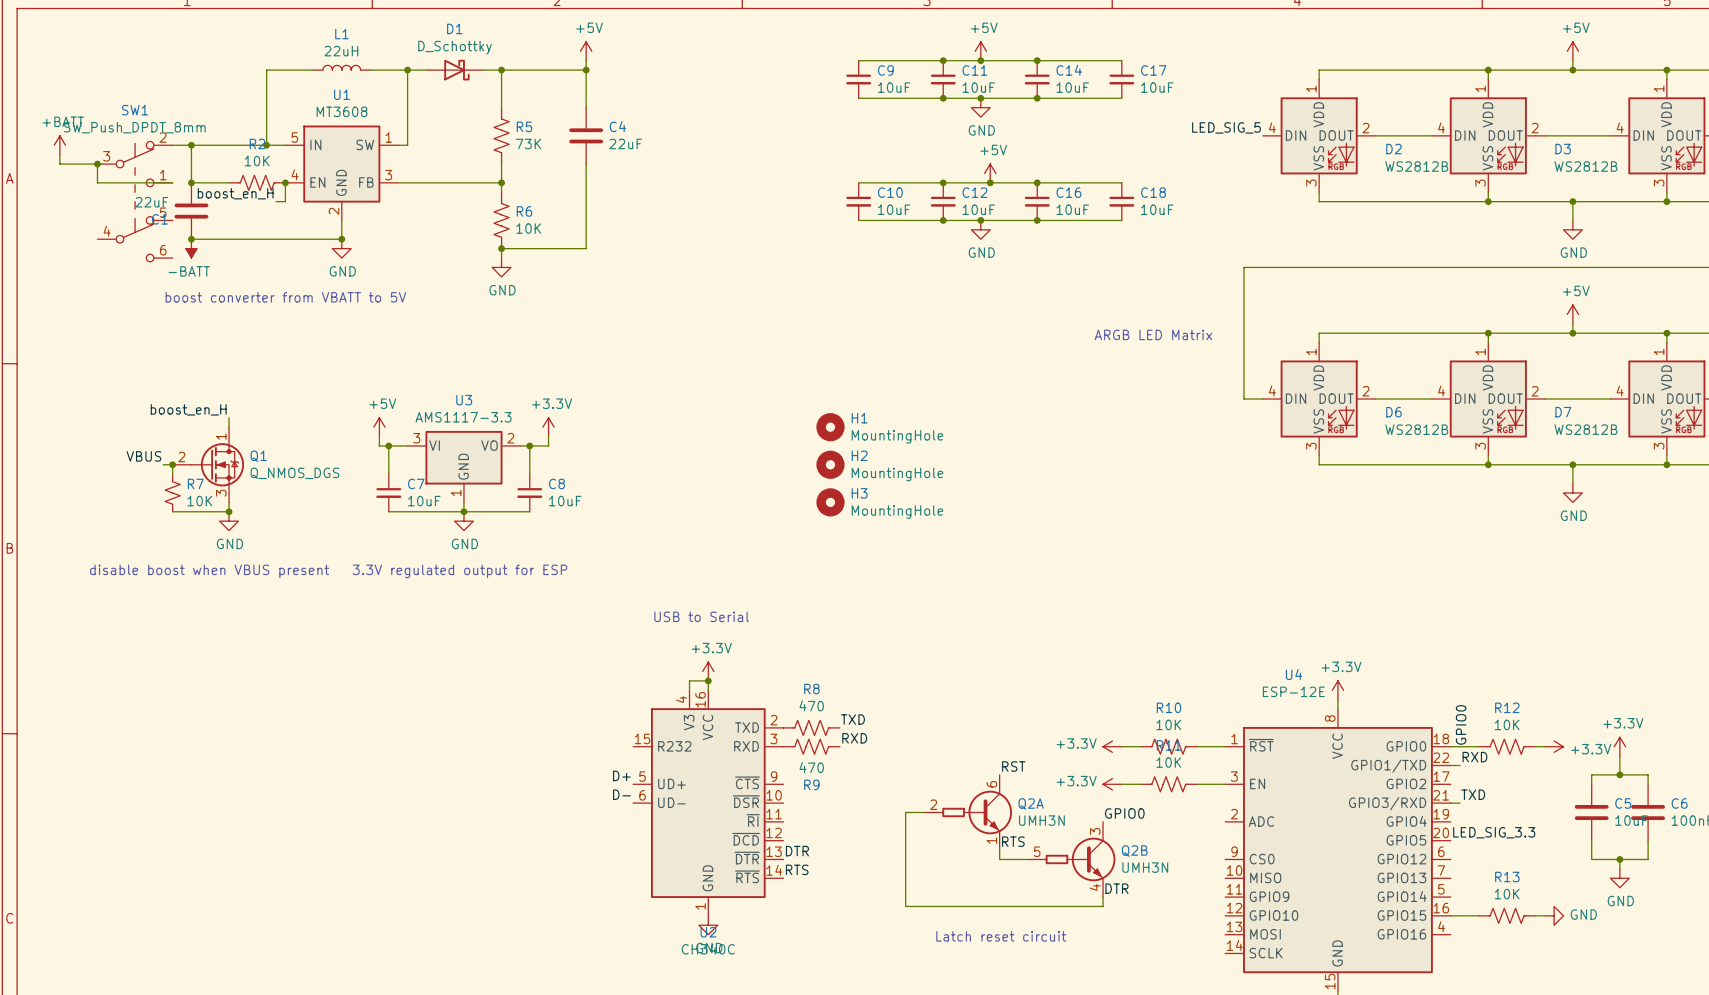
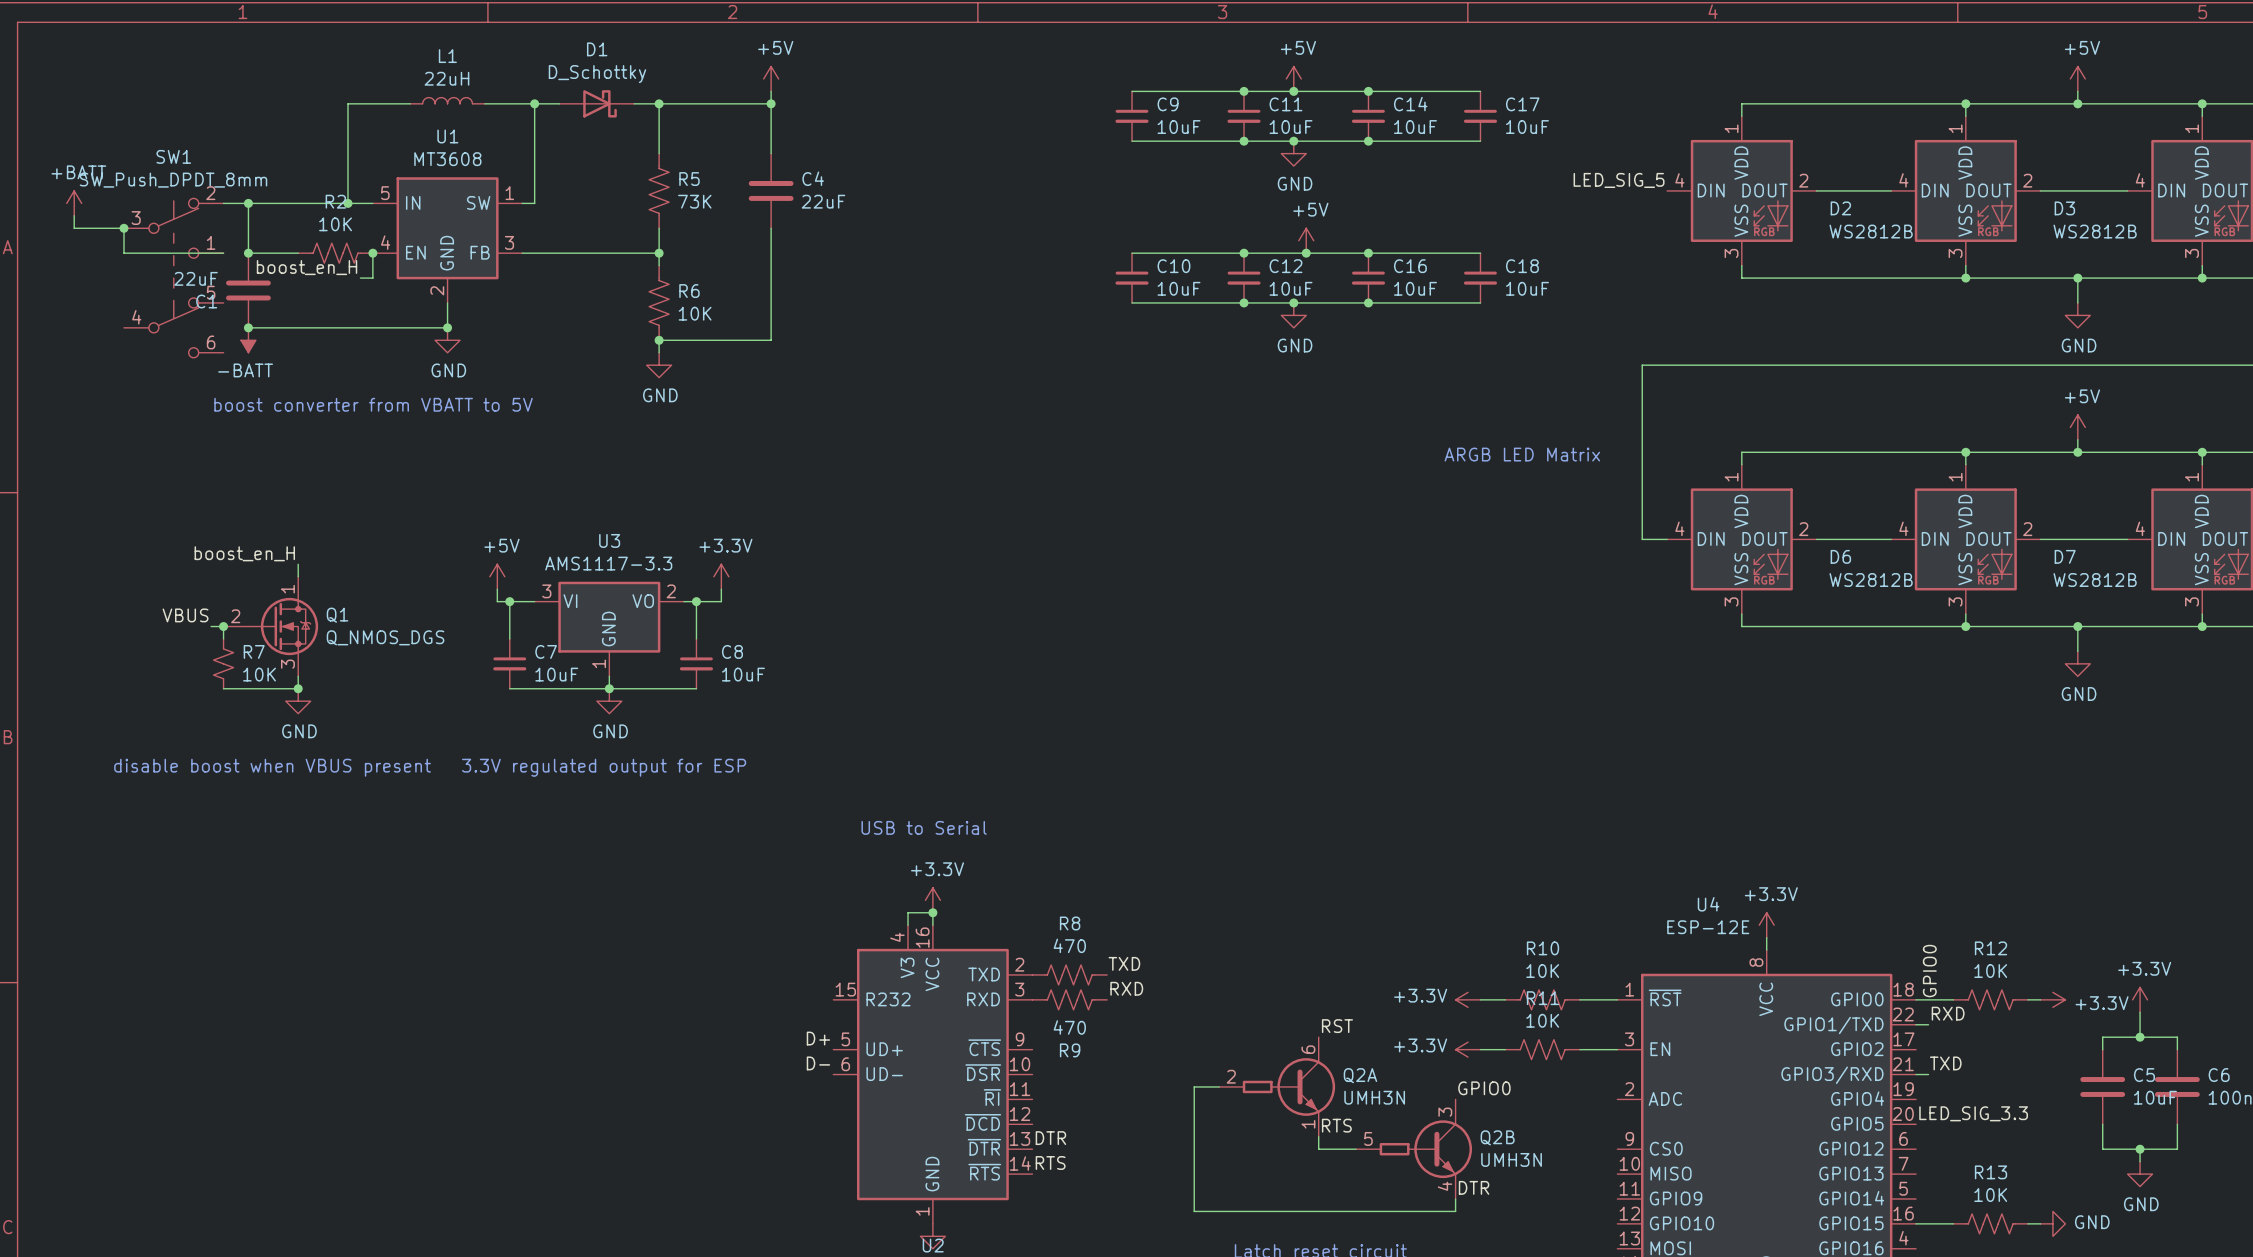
H1: MountingHole (830, 427) -> none
H2: MountingHole (830, 464) -> none
H3: MountingHole (830, 502) -> none

